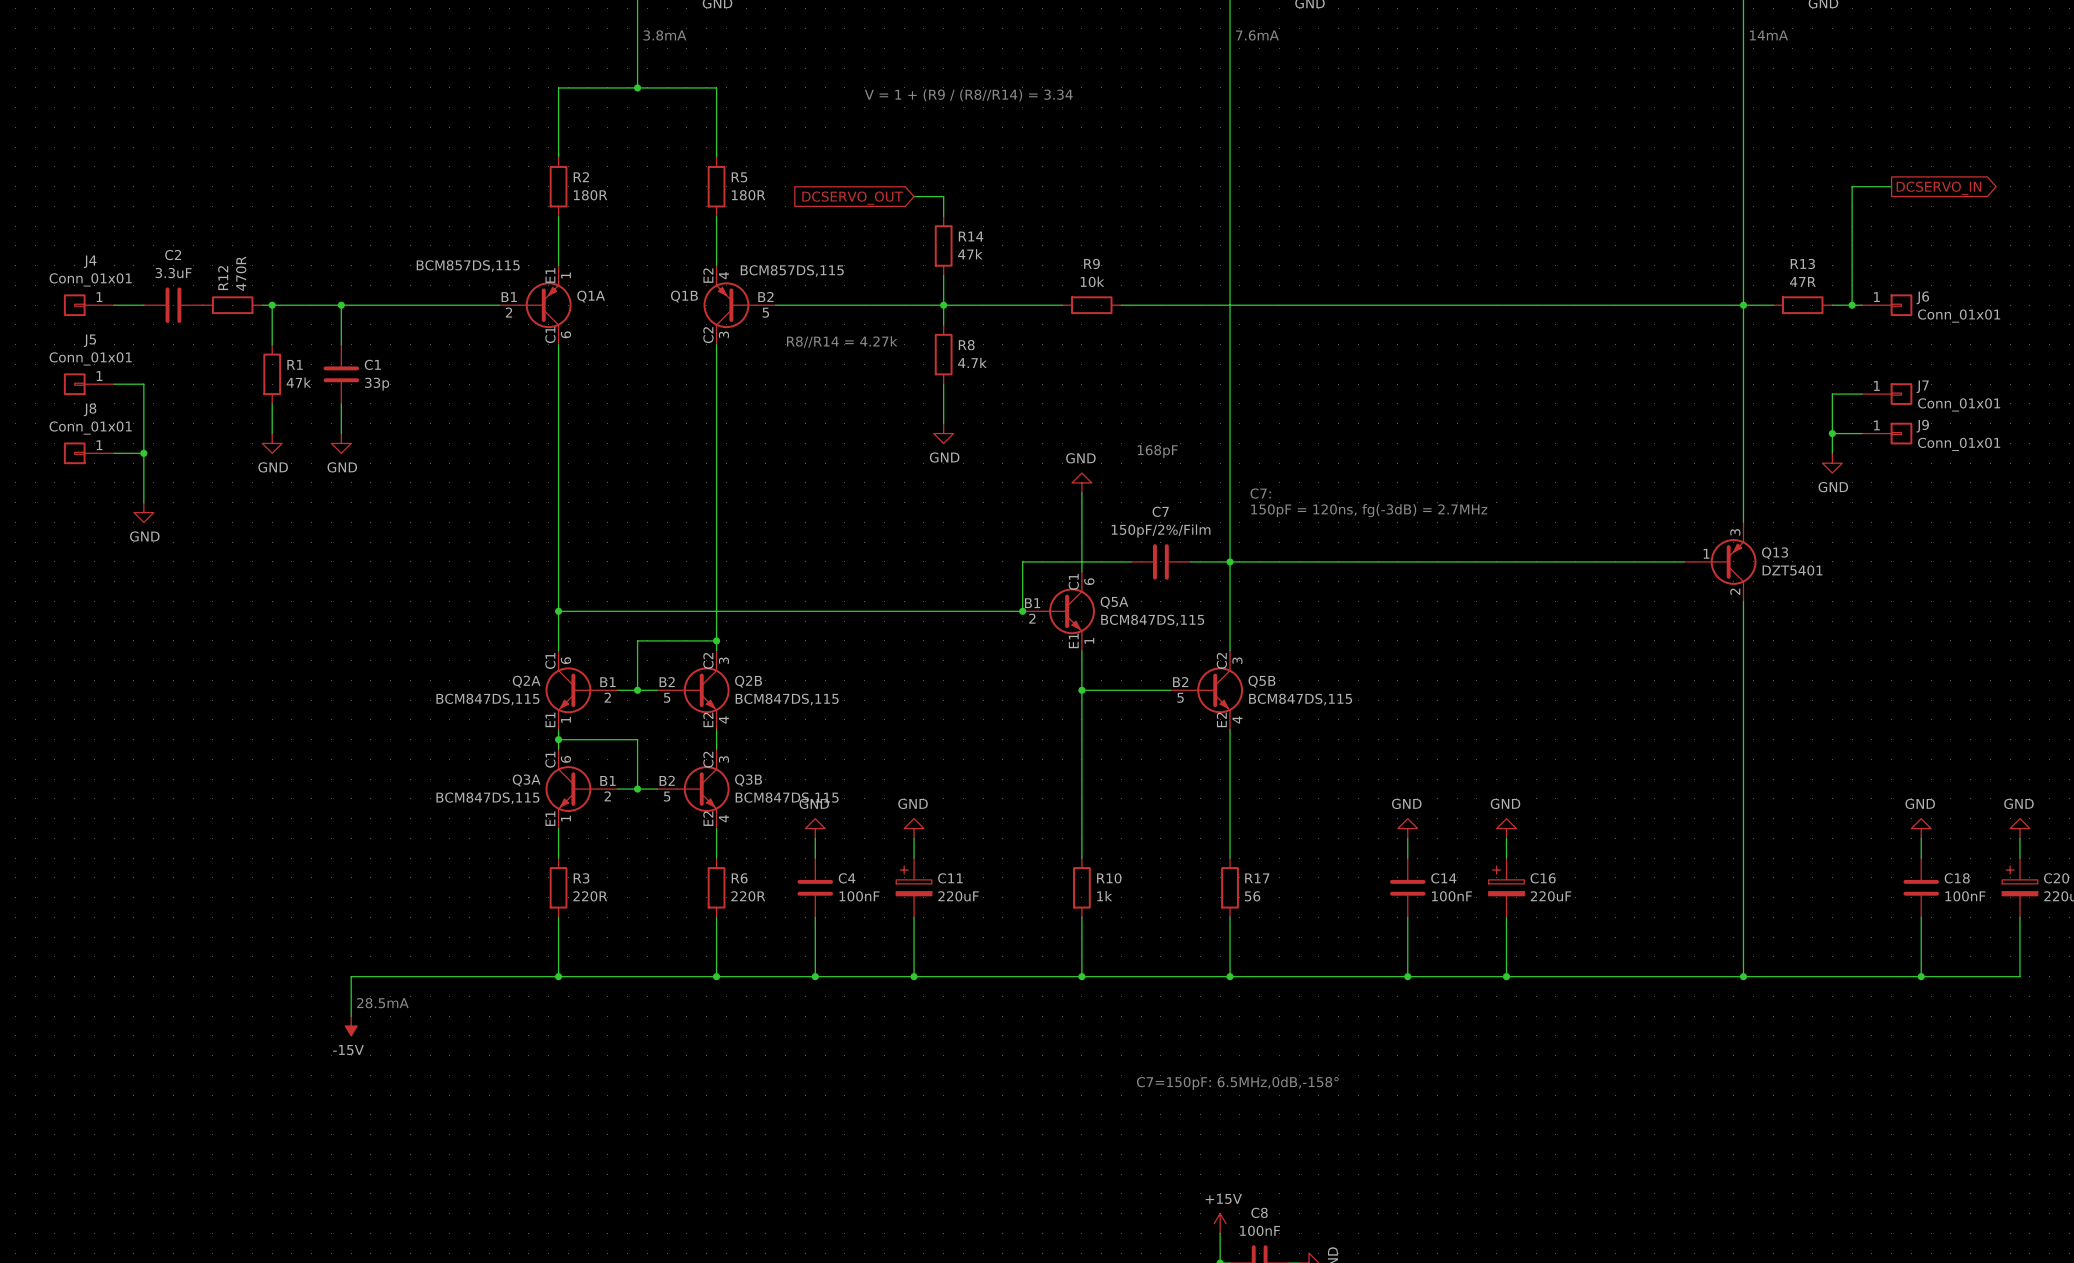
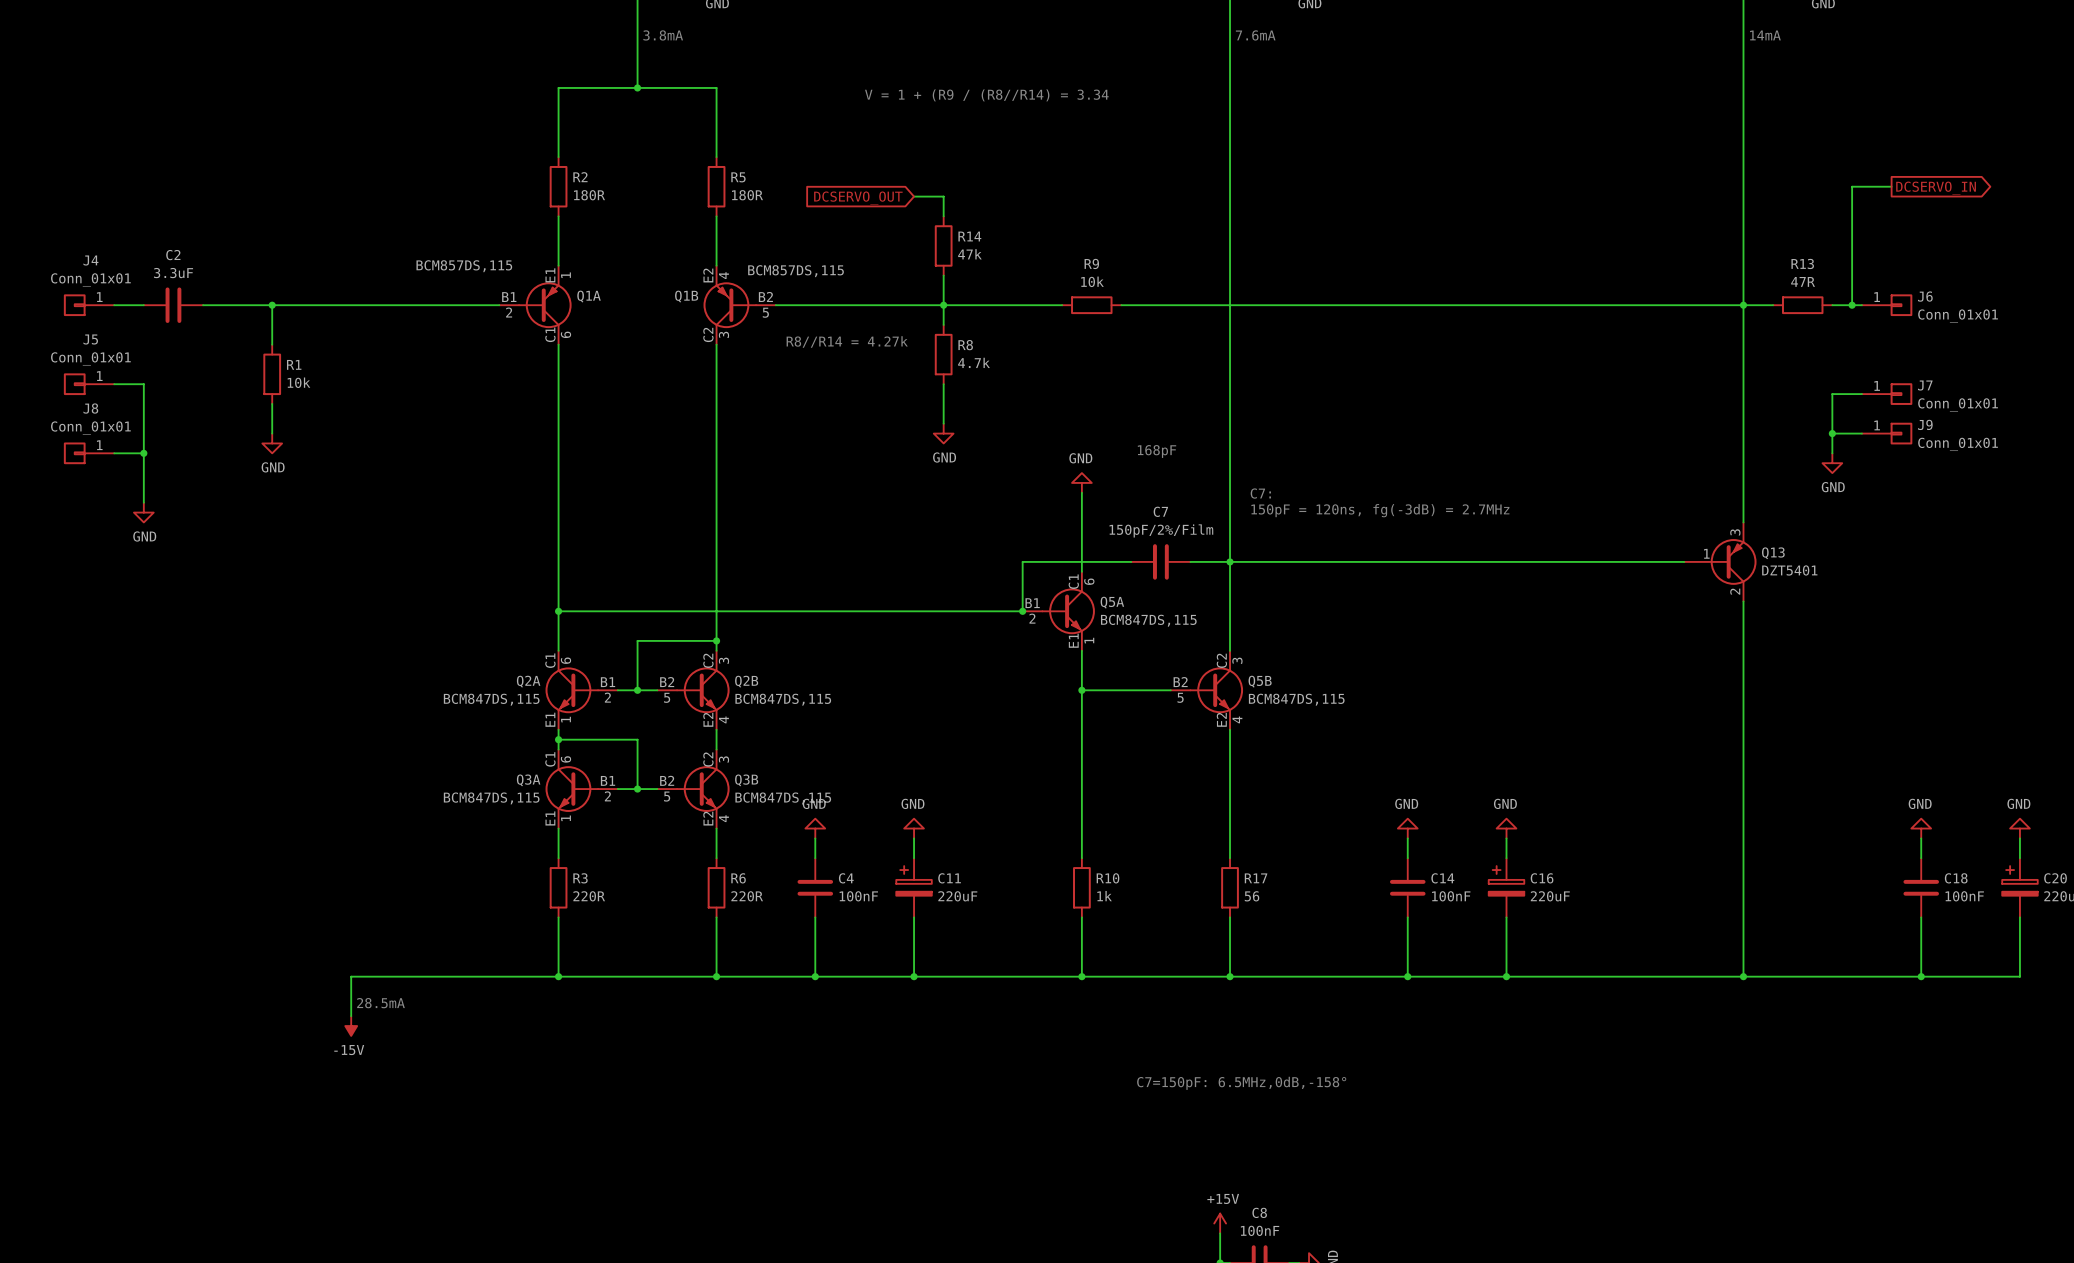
wire: none -> (203, 305) (262, 305)
R12: 470R (232, 305) -> none
wire: (341, 305) (341, 344) -> none
junction: (341, 305) -> none
C1: 33p (341, 374) -> none
R1 value: 47k (298, 382) -> 10k (298, 382)
wire: (341, 403) (341, 433) -> none
power symbol: GND (341, 443) -> none

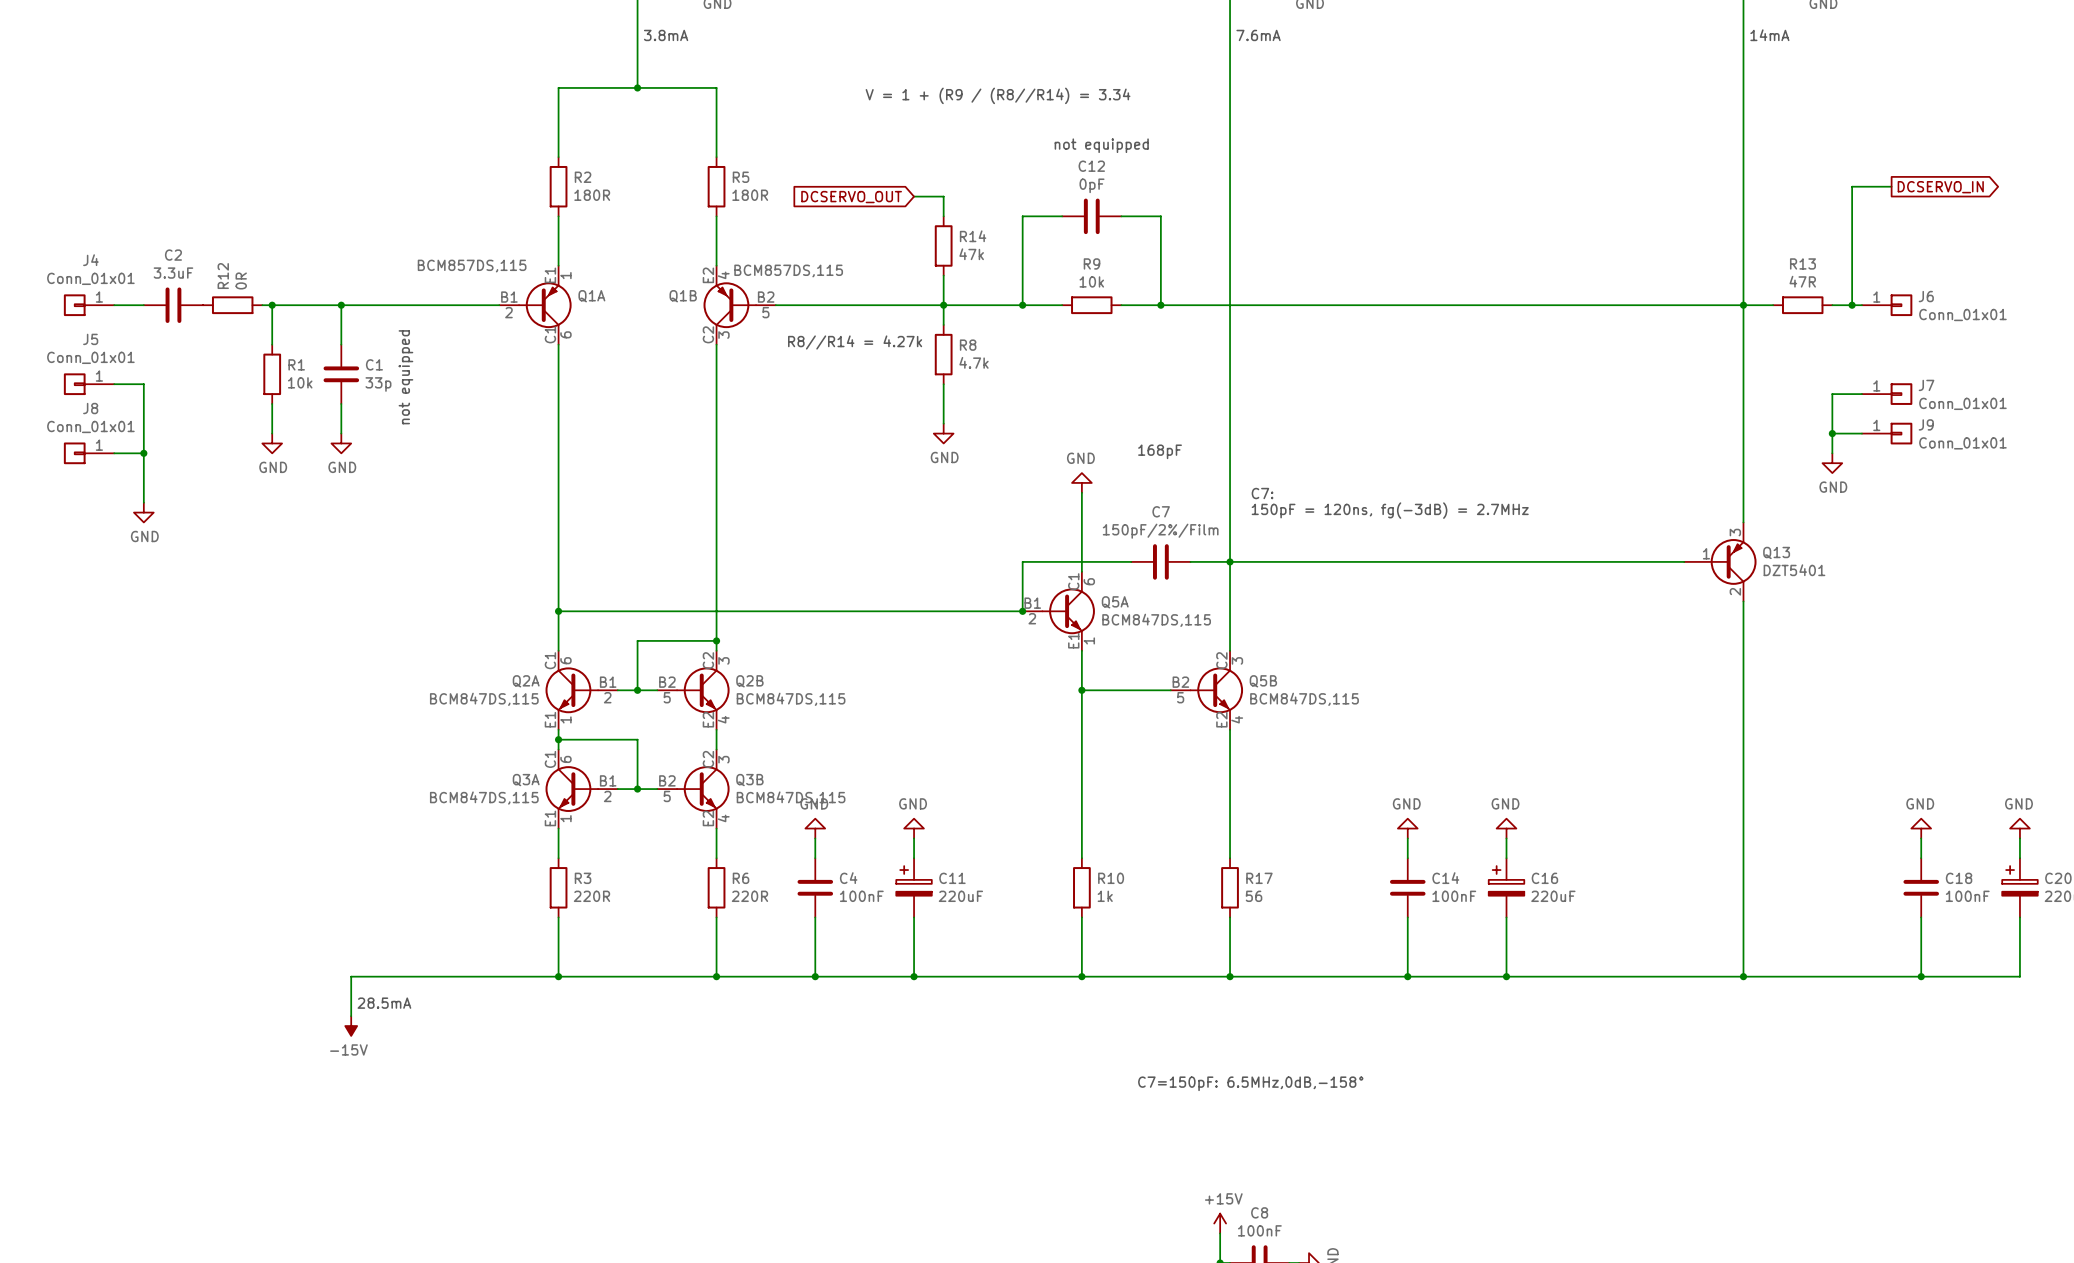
text: none -> not equipped (1101, 145)
wire: none -> (1062, 216) (1022, 216) (1022, 305)
C12: none -> 0pF (1091, 216)
wire: none -> (1121, 216) (1160, 216) (1160, 305)
wire: (203, 305) (262, 305) -> none
R12: none -> 0R (232, 305)
wire: none -> (341, 305) (341, 344)
junction: none -> (341, 305)
junction: none -> (1022, 305)
junction: none -> (1160, 305)
C1: none -> 33p (341, 374)
text: none -> not equipped (405, 377)
wire: none -> (341, 403) (341, 433)
power symbol: none -> GND (341, 443)

